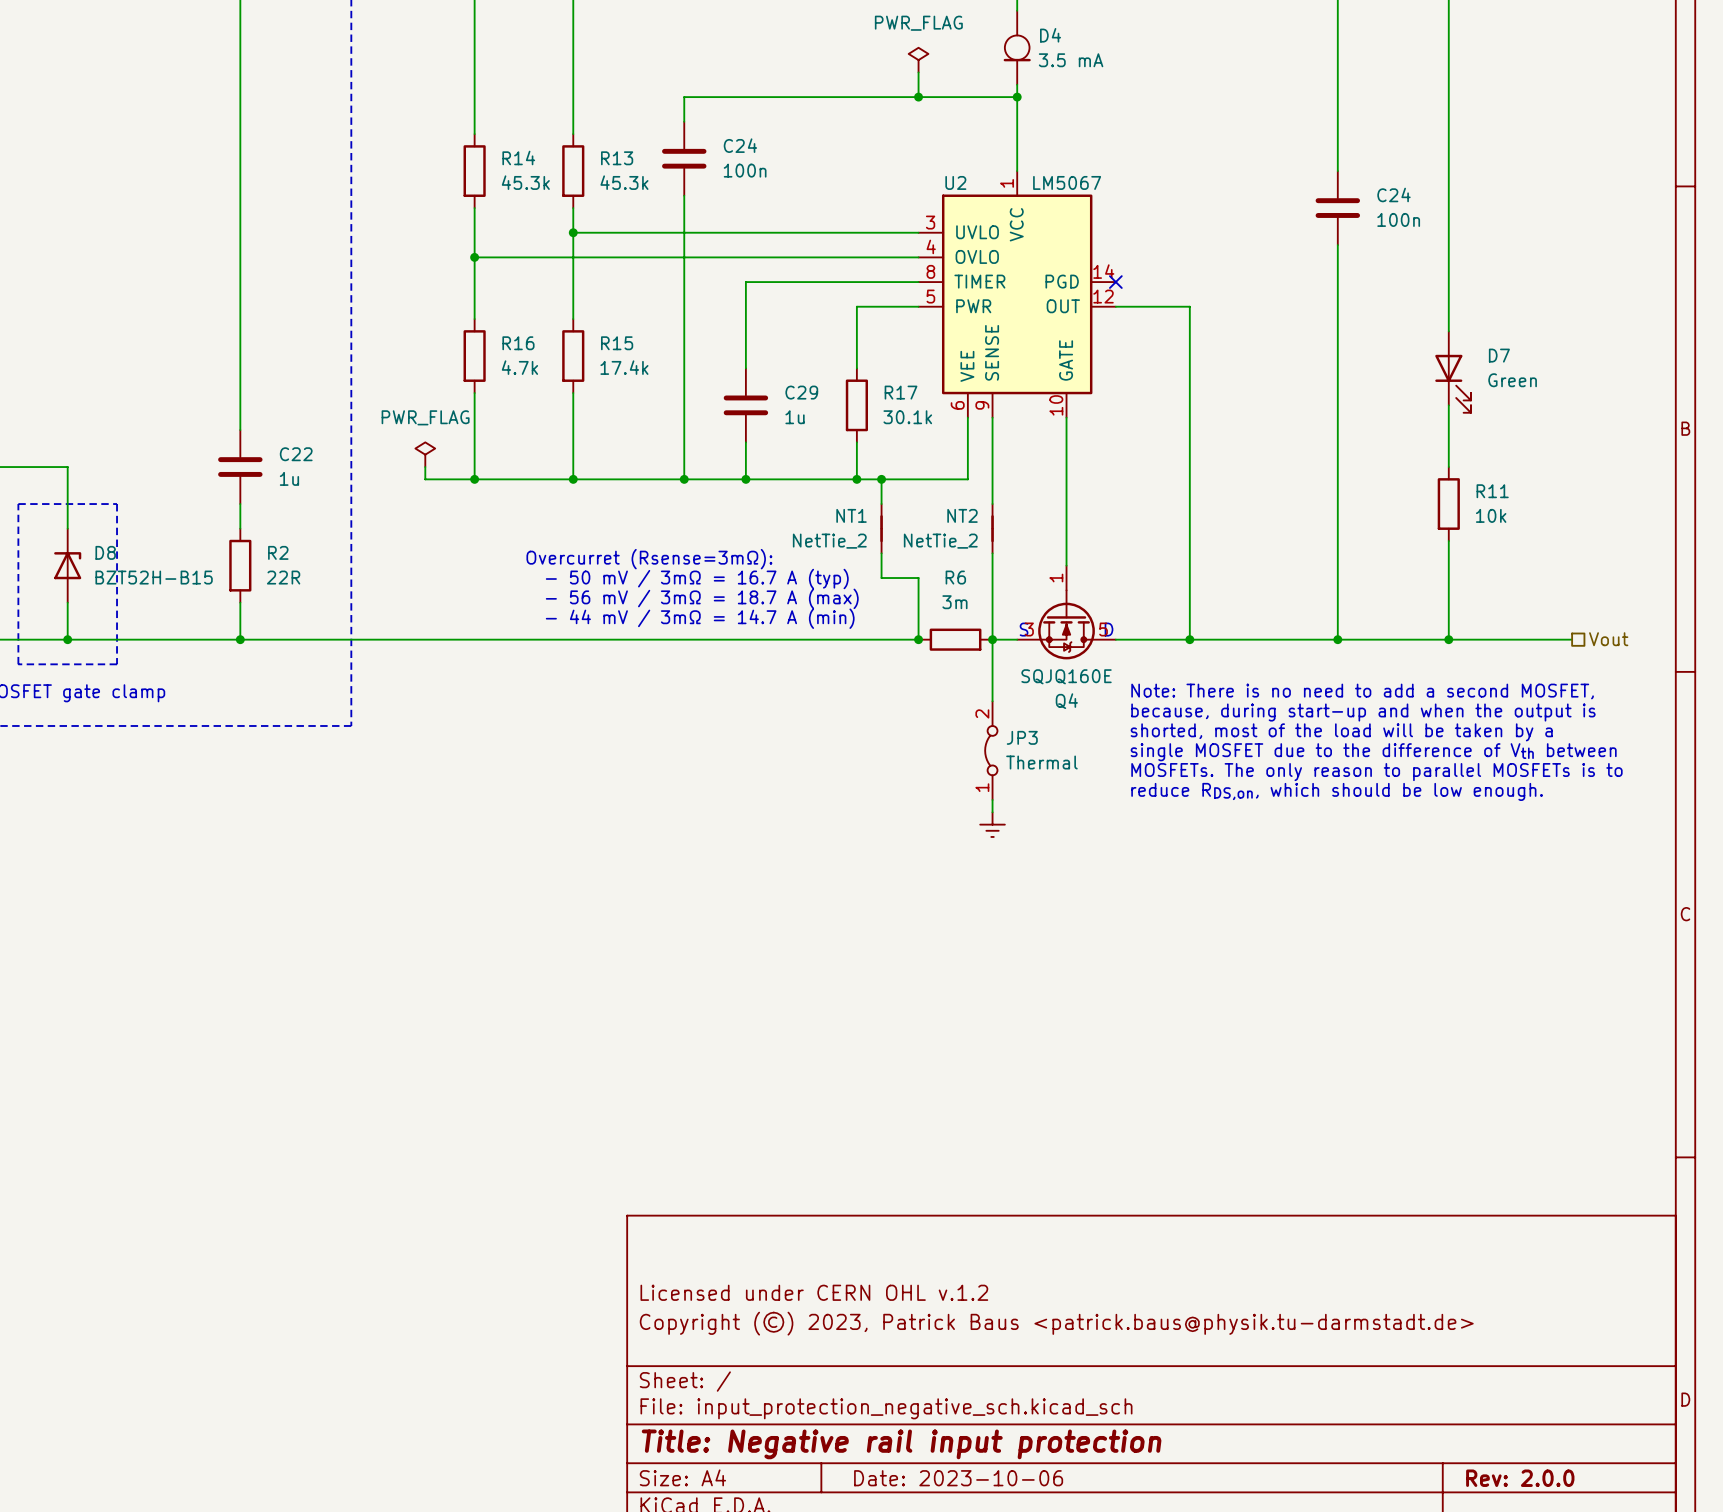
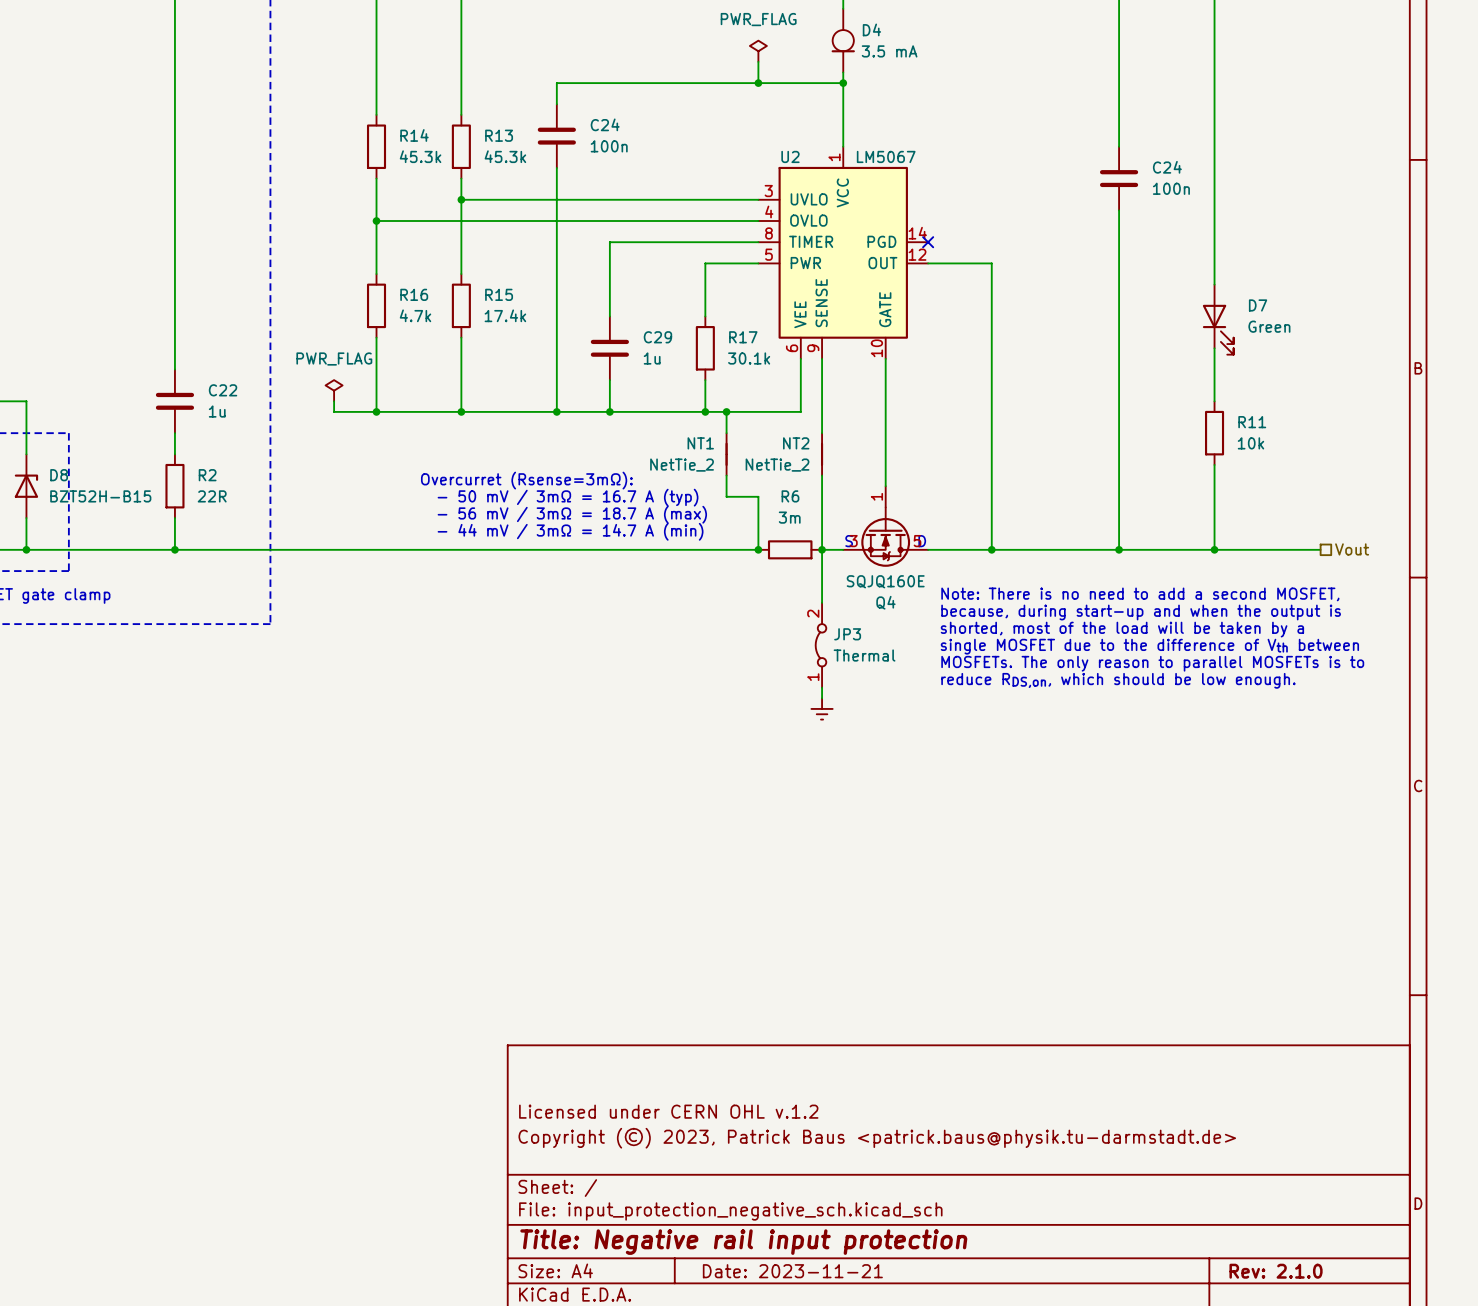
title block: Date: 2023-10-06 (958, 1478) -> Date: 2023-11-21 (792, 1271)
title block: Rev: 2.0.0 (1520, 1478) -> Rev: 2.1.0 (1276, 1271)

